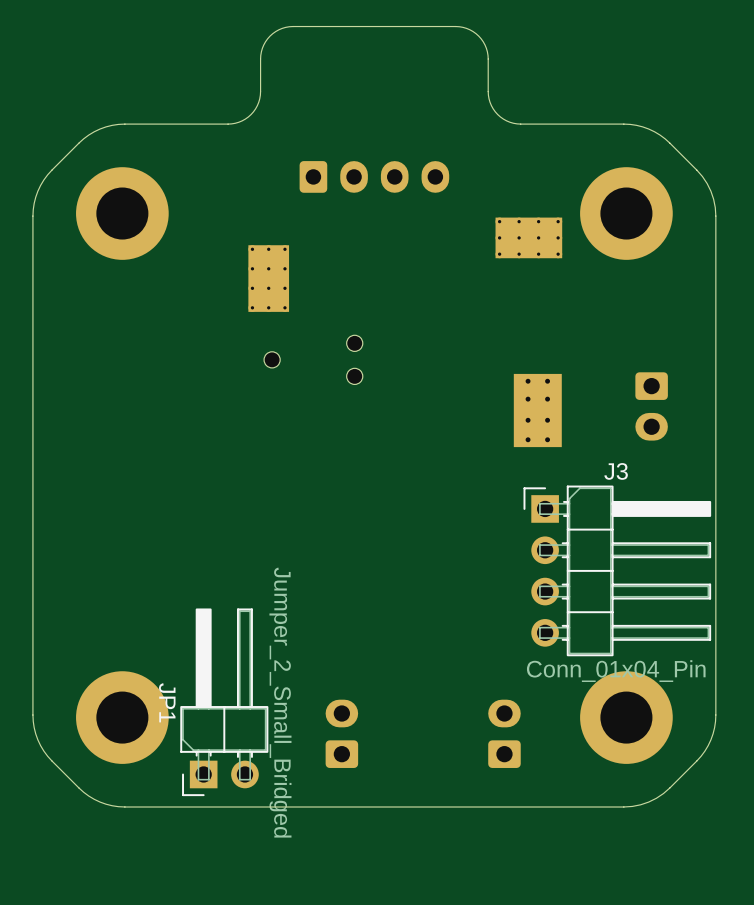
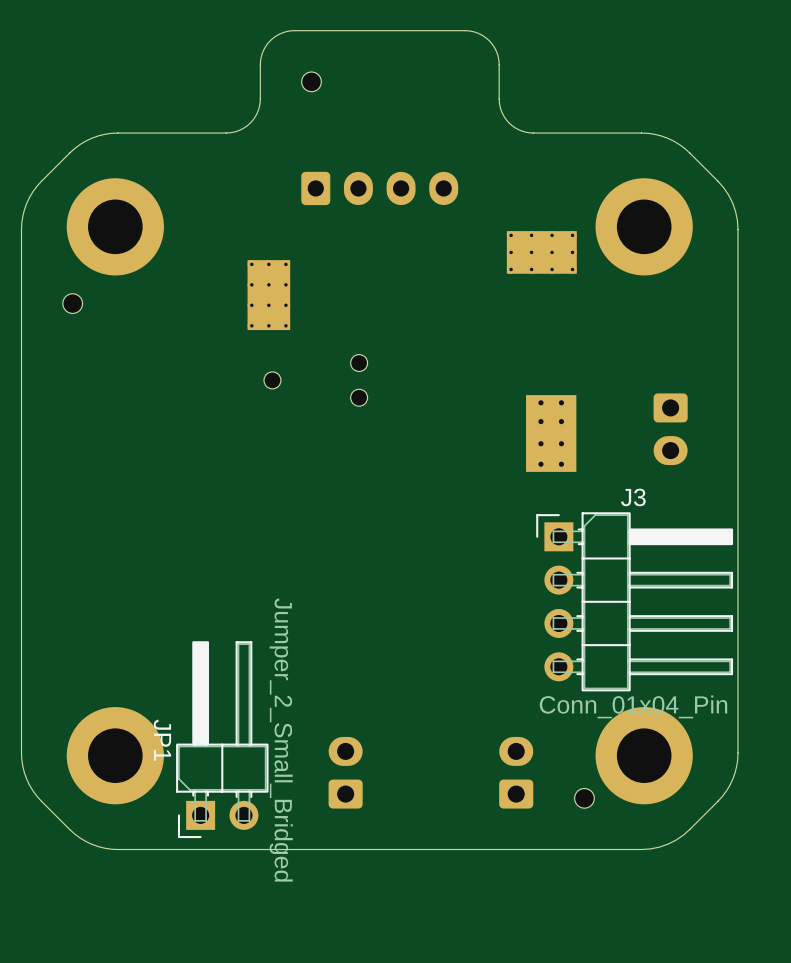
part: none -> (311, 81)
part: none -> (72, 303)
part: none -> (584, 798)

